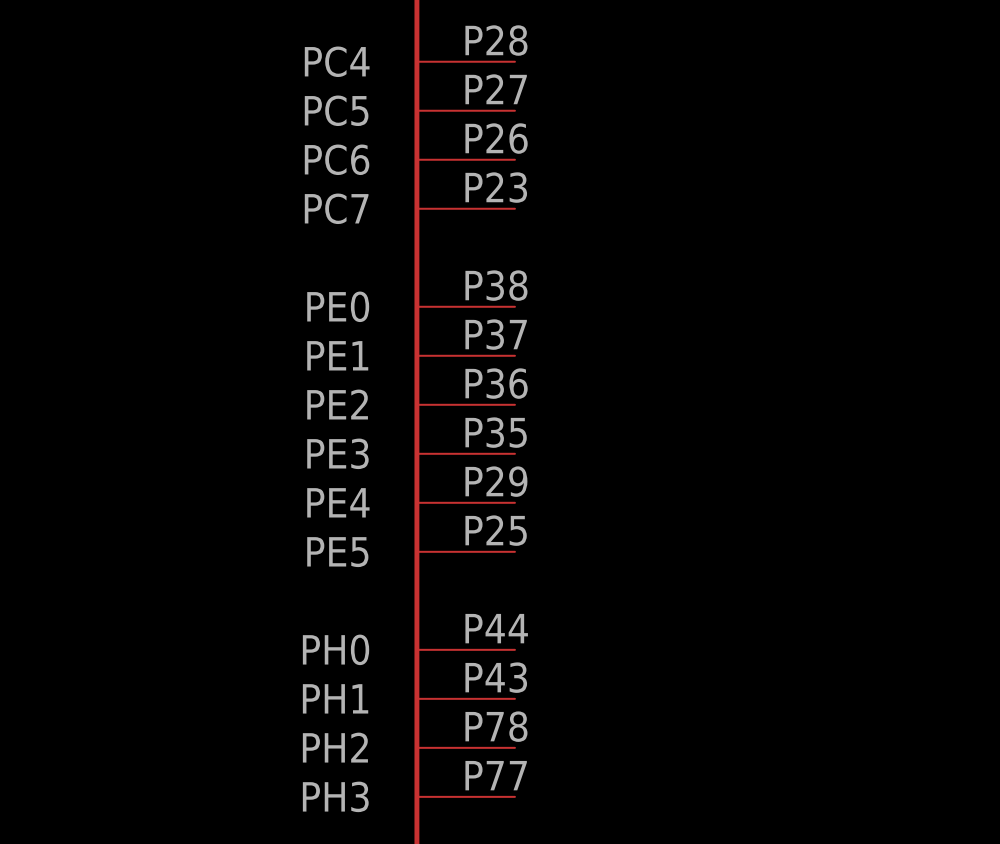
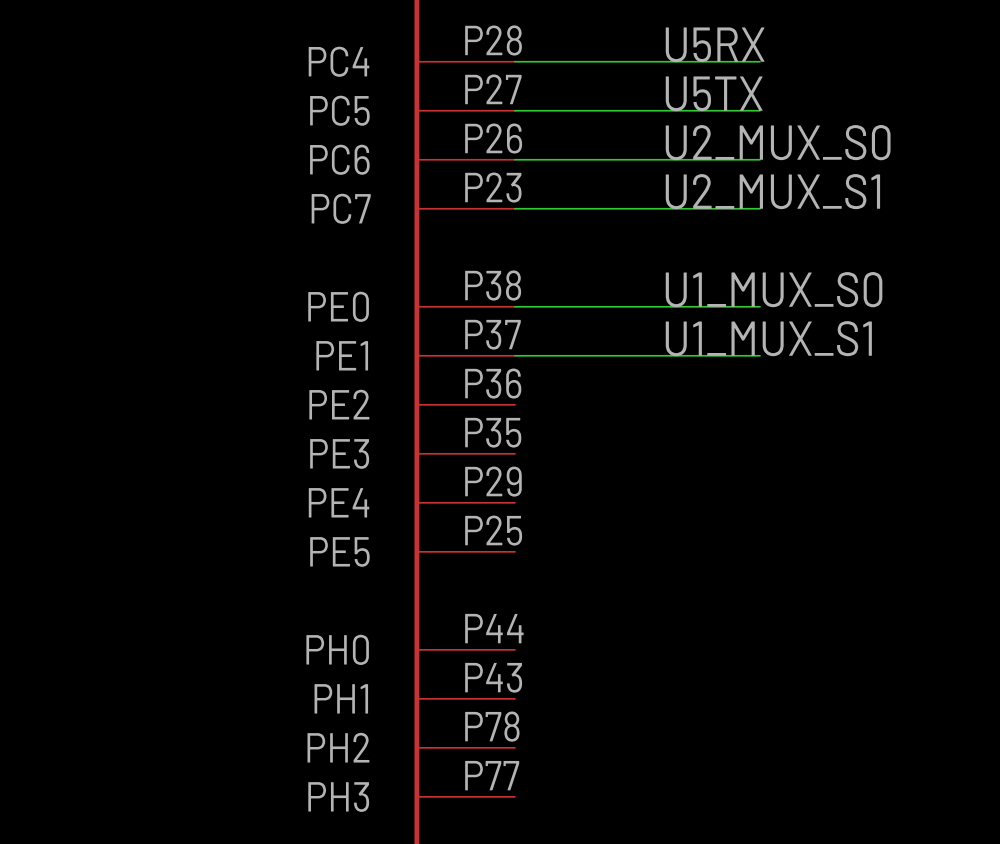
label: none -> U5RX (715, 44)
wire: none -> (514, 61) (759, 61)
label: none -> U5TX (714, 93)
wire: none -> (514, 110) (759, 110)
label: none -> U2_MUX_S0 (778, 142)
wire: none -> (514, 159) (759, 159)
label: none -> U2_MUX_S1 (772, 191)
wire: none -> (514, 208) (759, 208)
label: none -> U1_MUX_S0 (774, 289)
wire: none -> (514, 306) (759, 306)
label: none -> U1_MUX_S1 (768, 338)
wire: none -> (514, 355) (759, 355)

